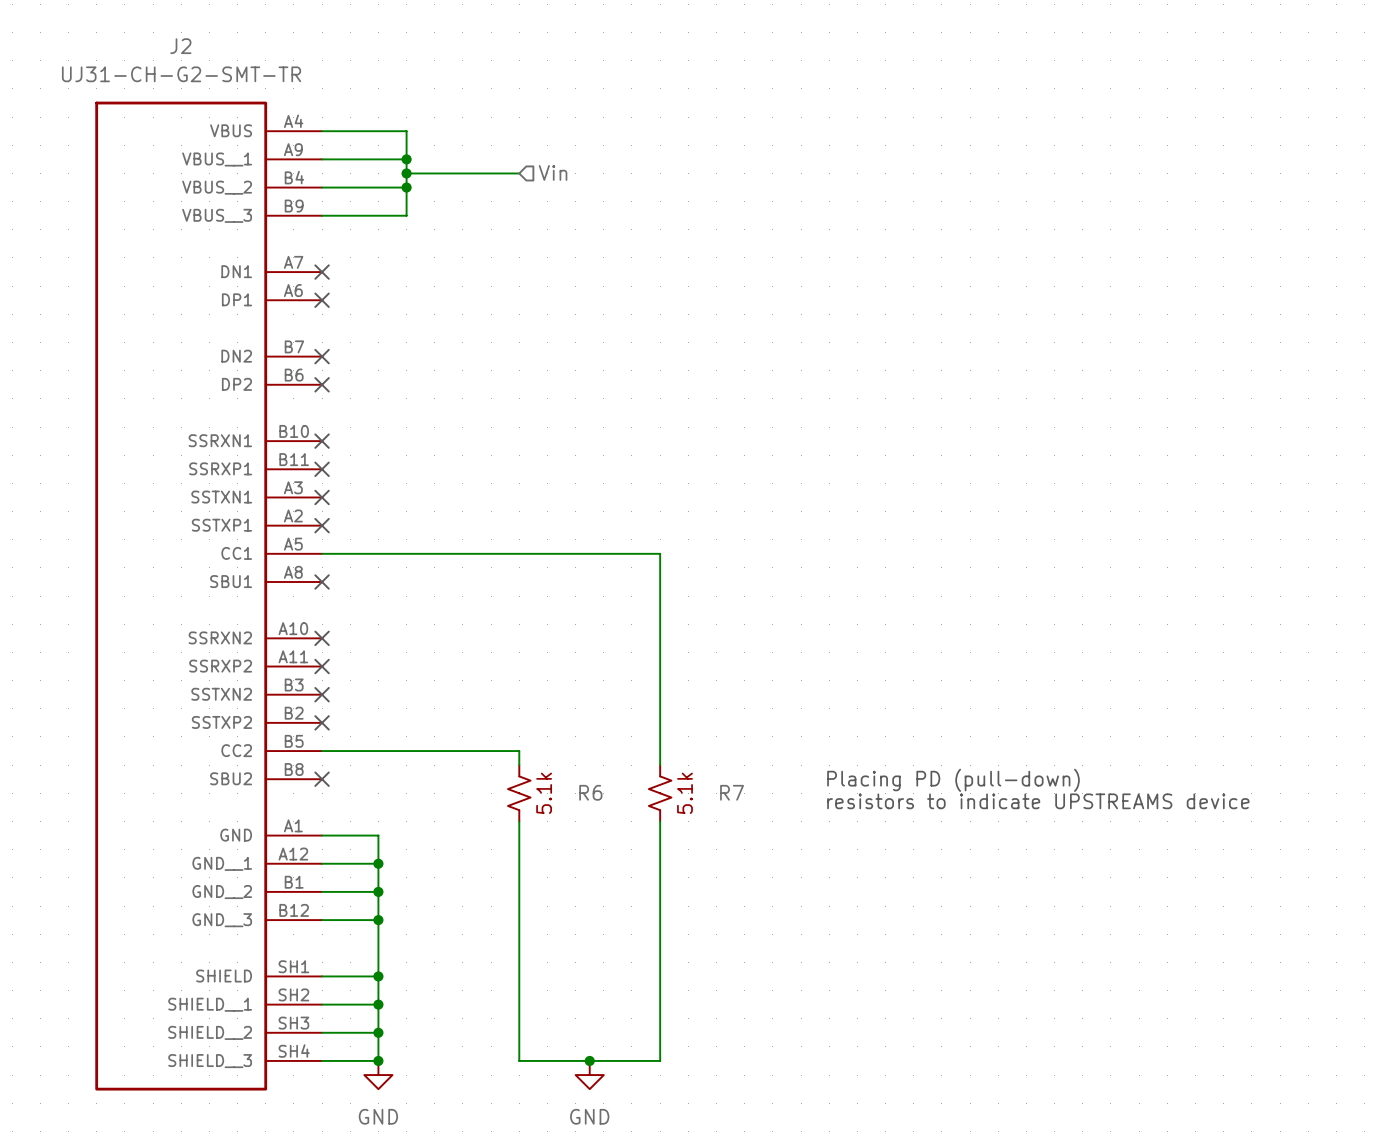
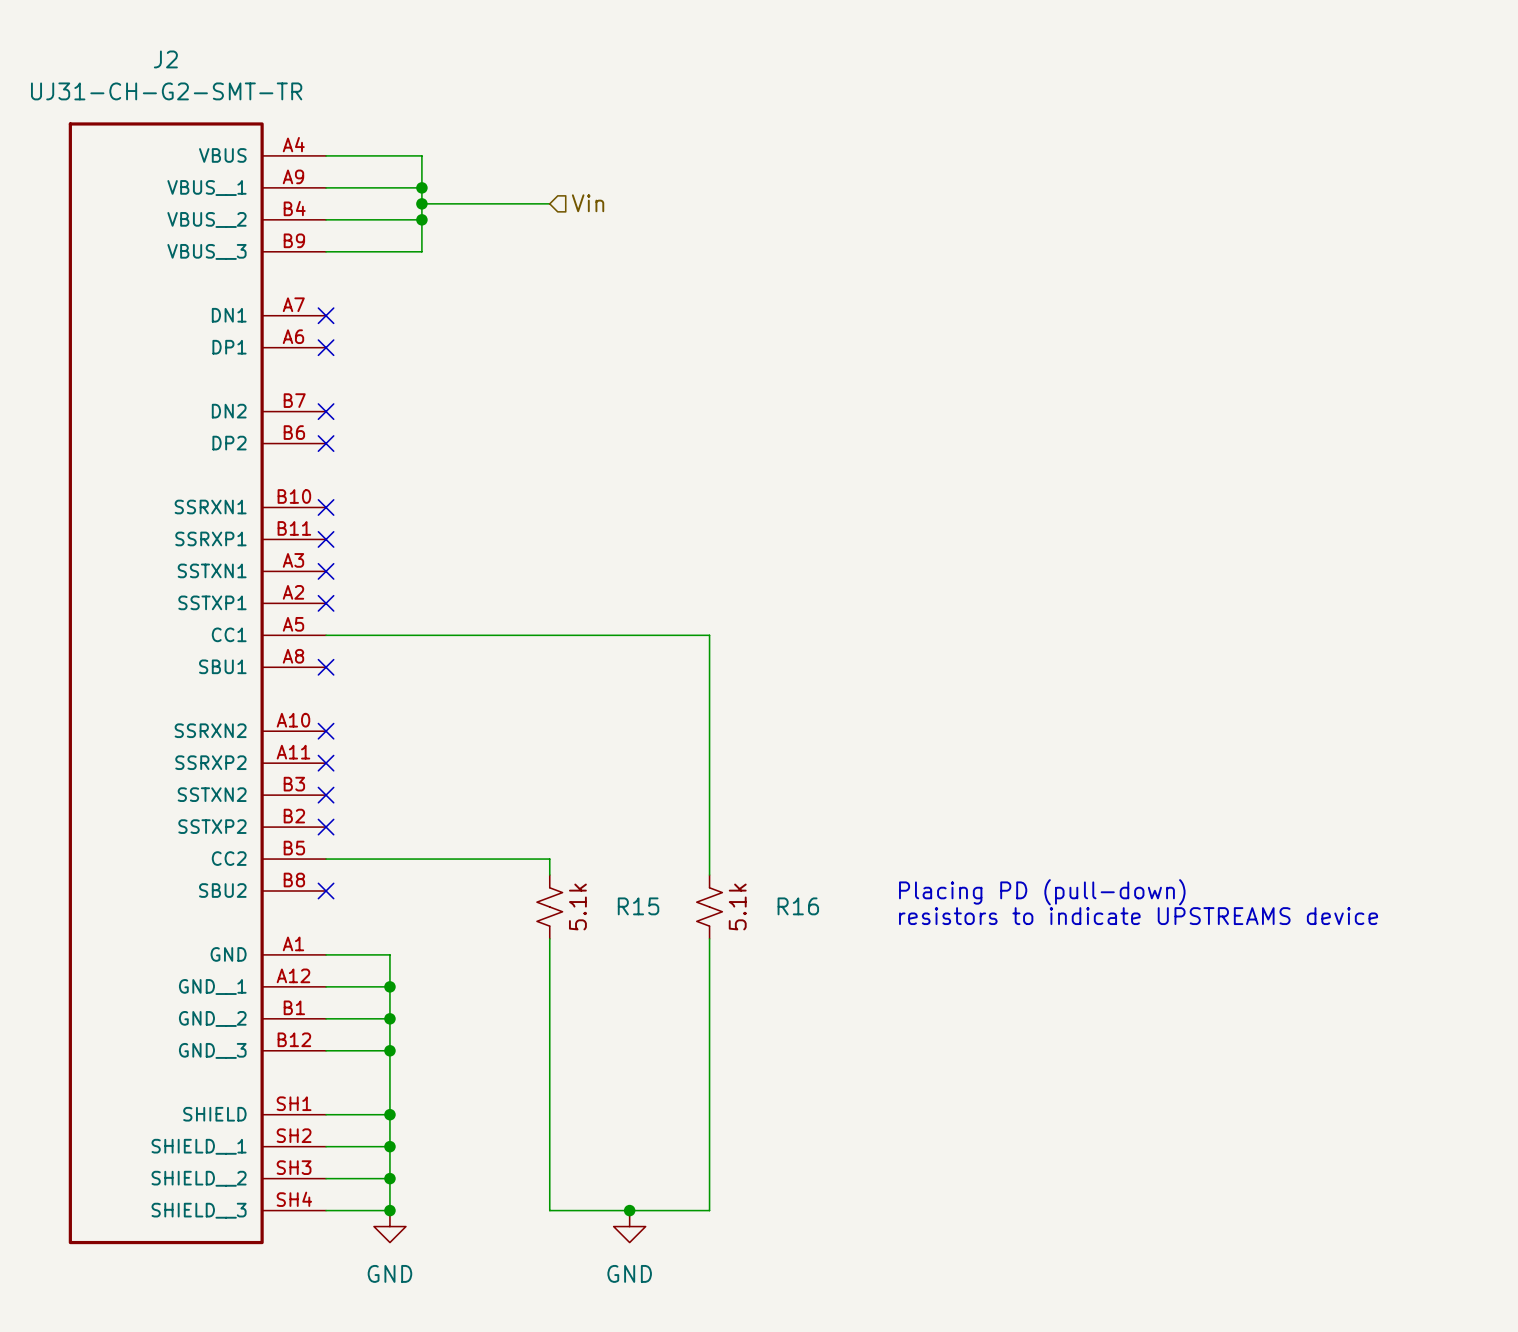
R6 name: R6 (590, 792) -> R15 (638, 906)
R7 name: R7 (732, 792) -> R16 (798, 906)

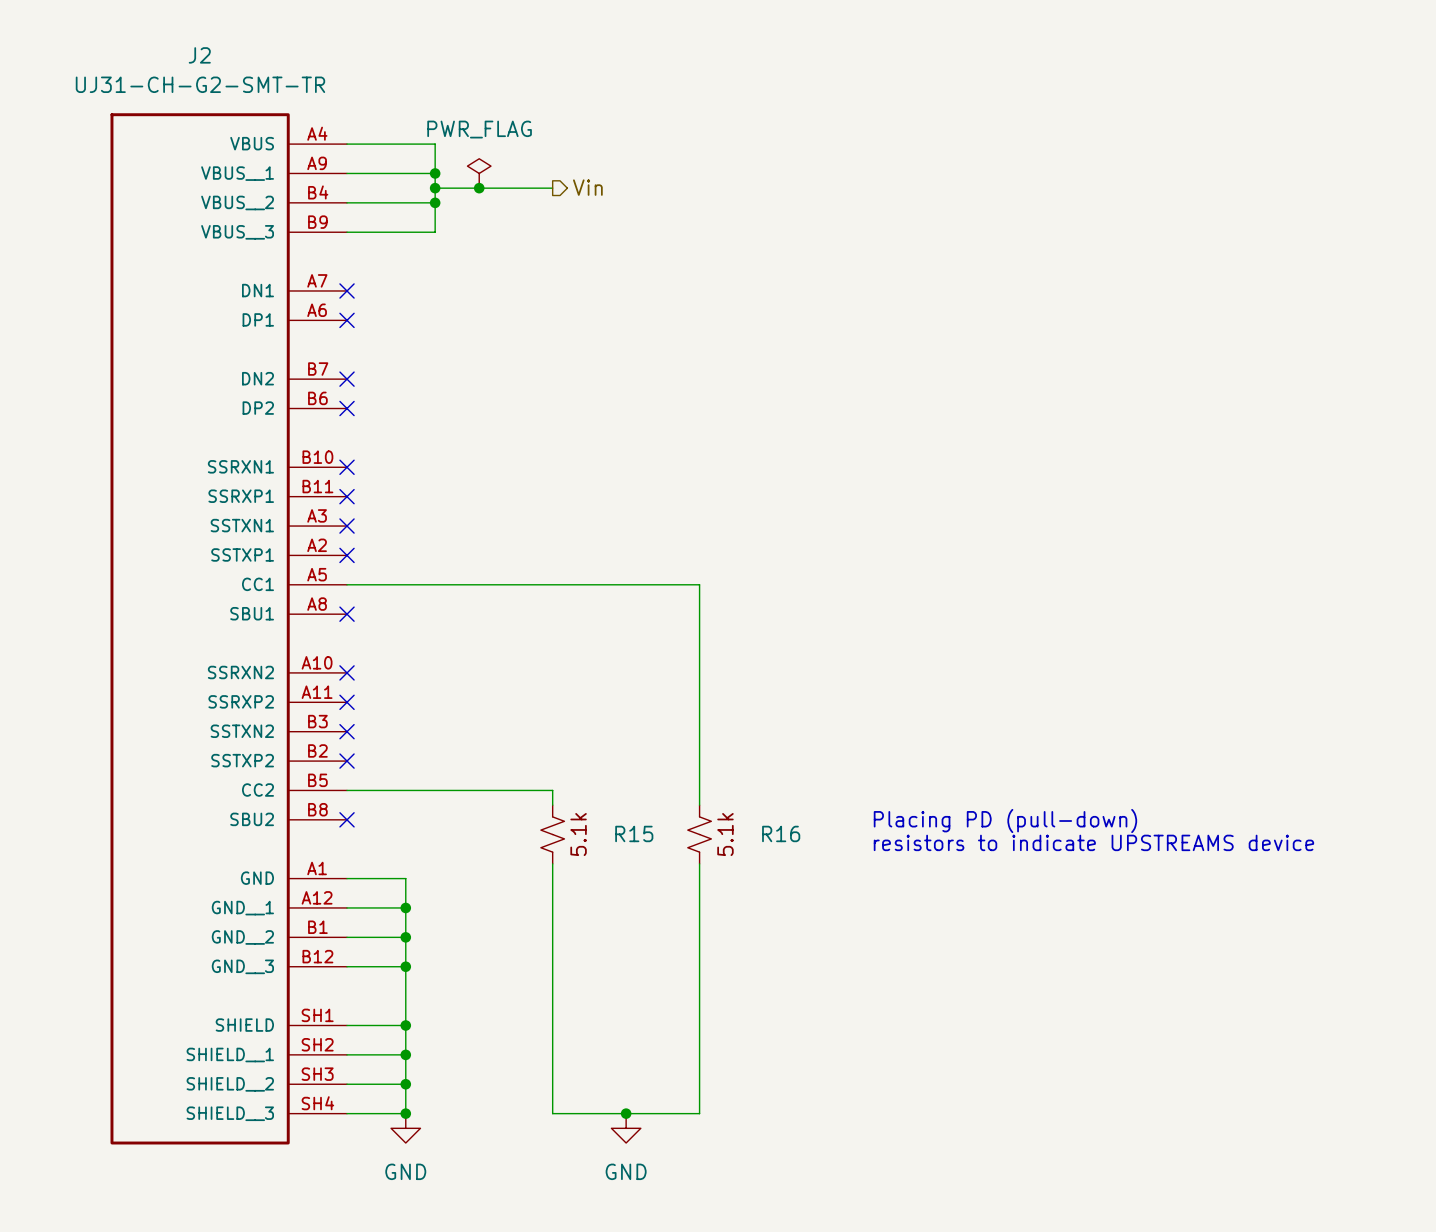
power symbol: none -> PWR_FLAG (479, 173)
junction: none -> (479, 188)
hierarchical label shape: input (588, 203) -> output (587, 187)

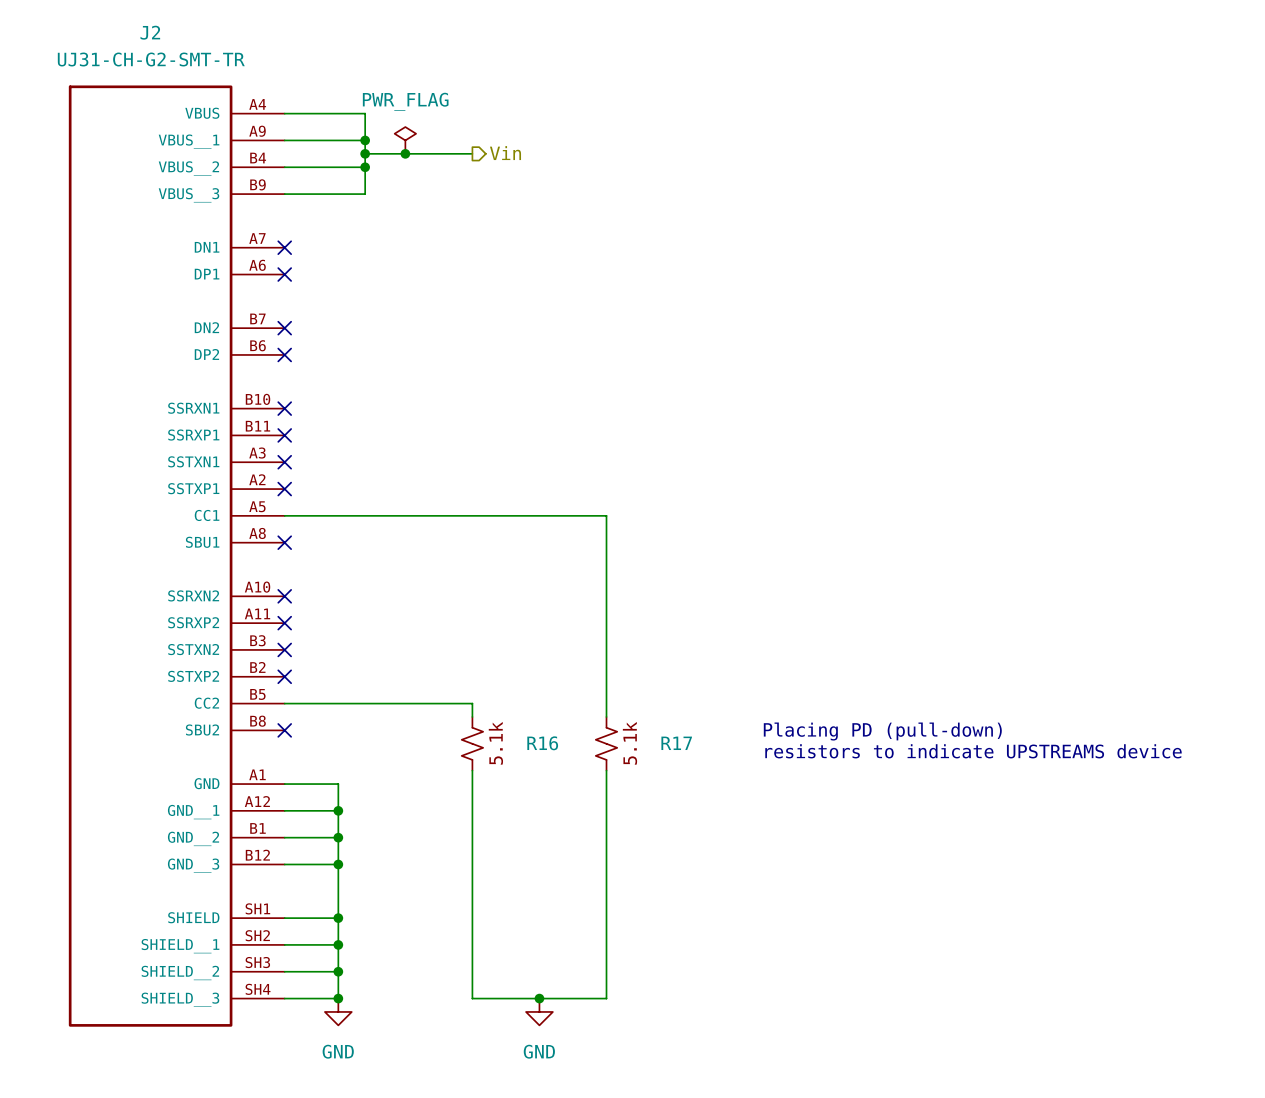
R15 name: R15 (634, 833) -> R16 (542, 743)
R16 name: R16 (781, 833) -> R17 (676, 743)

